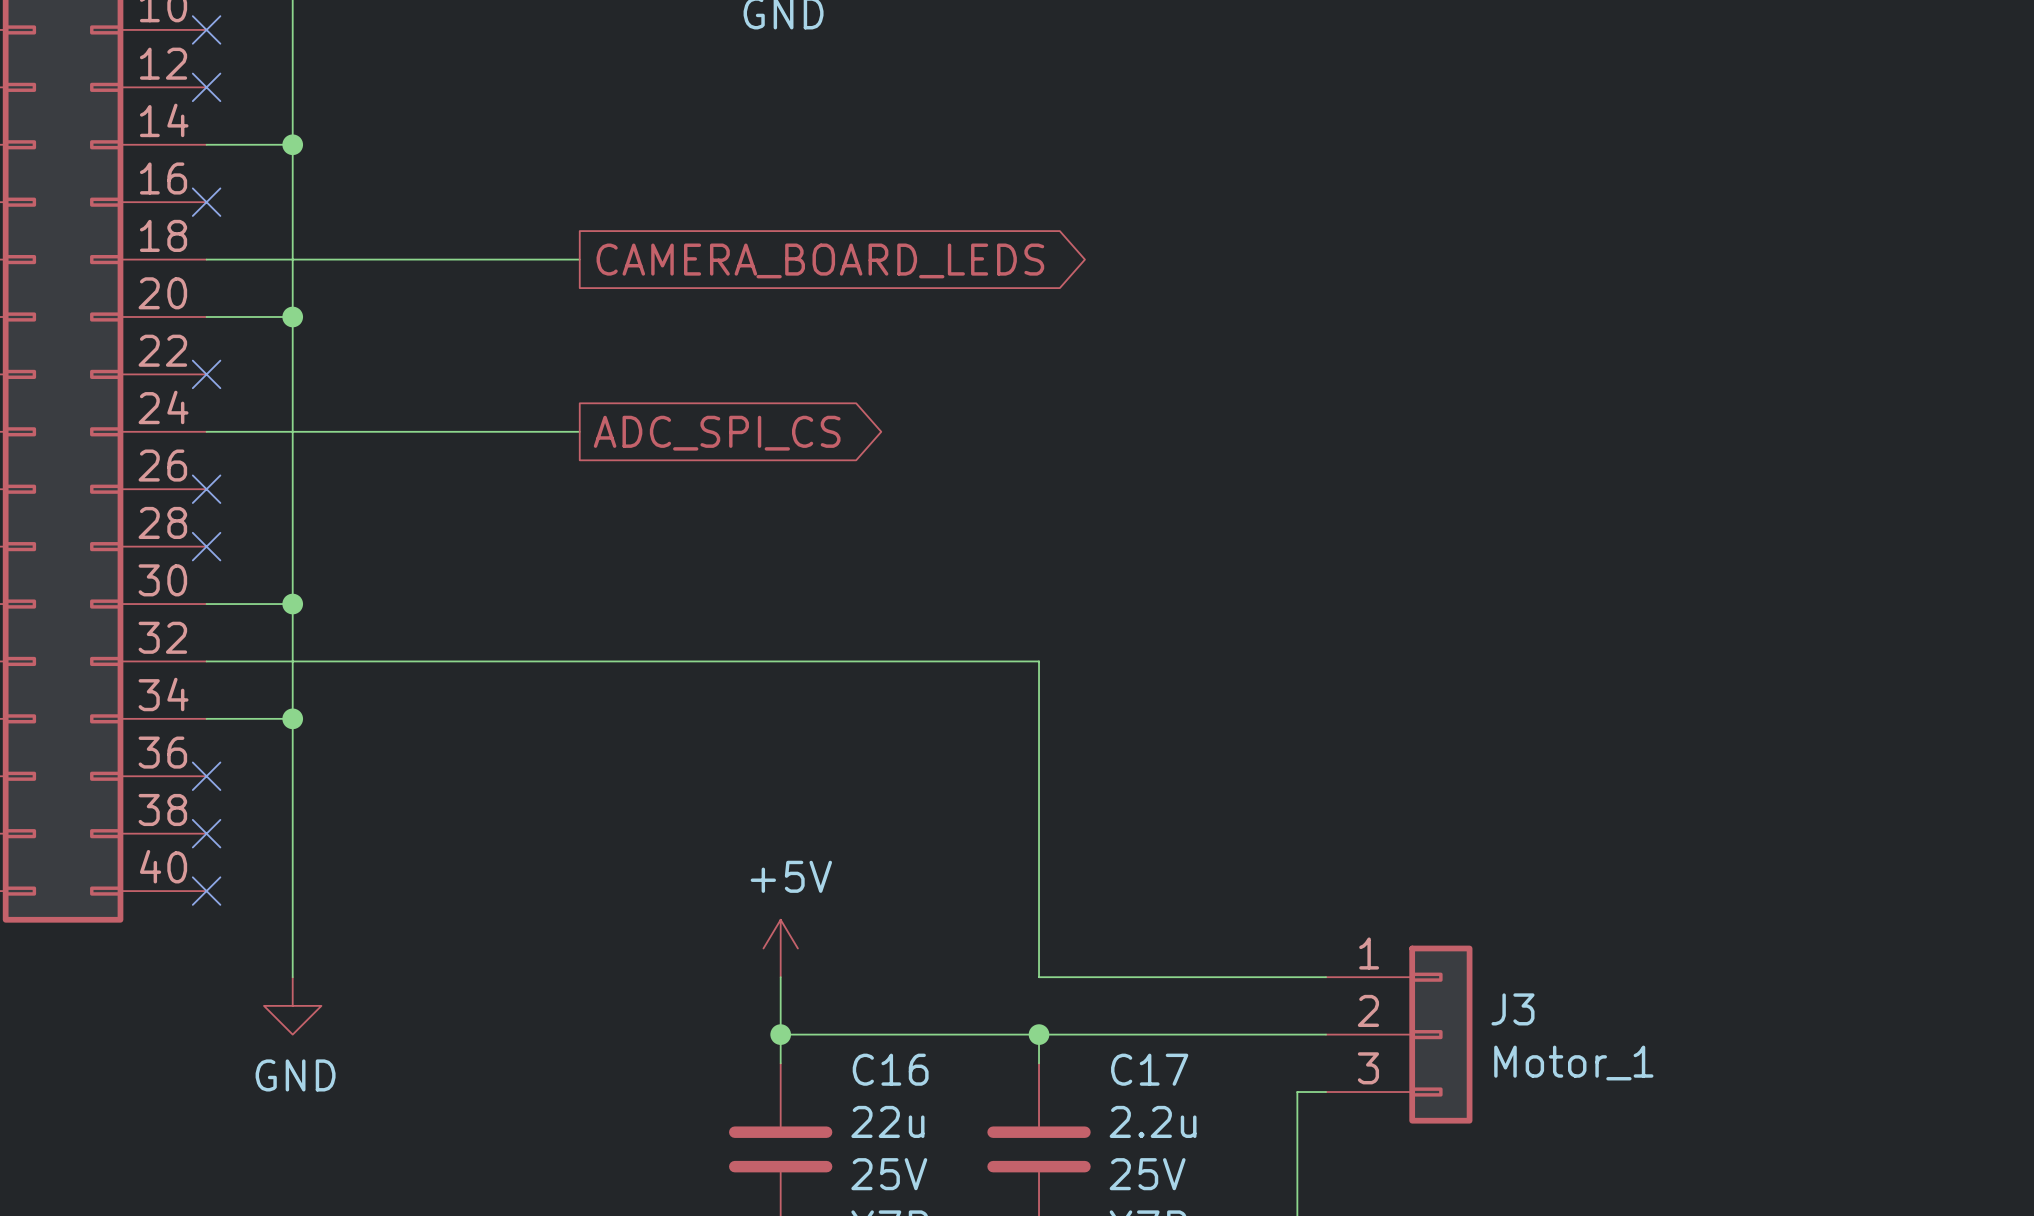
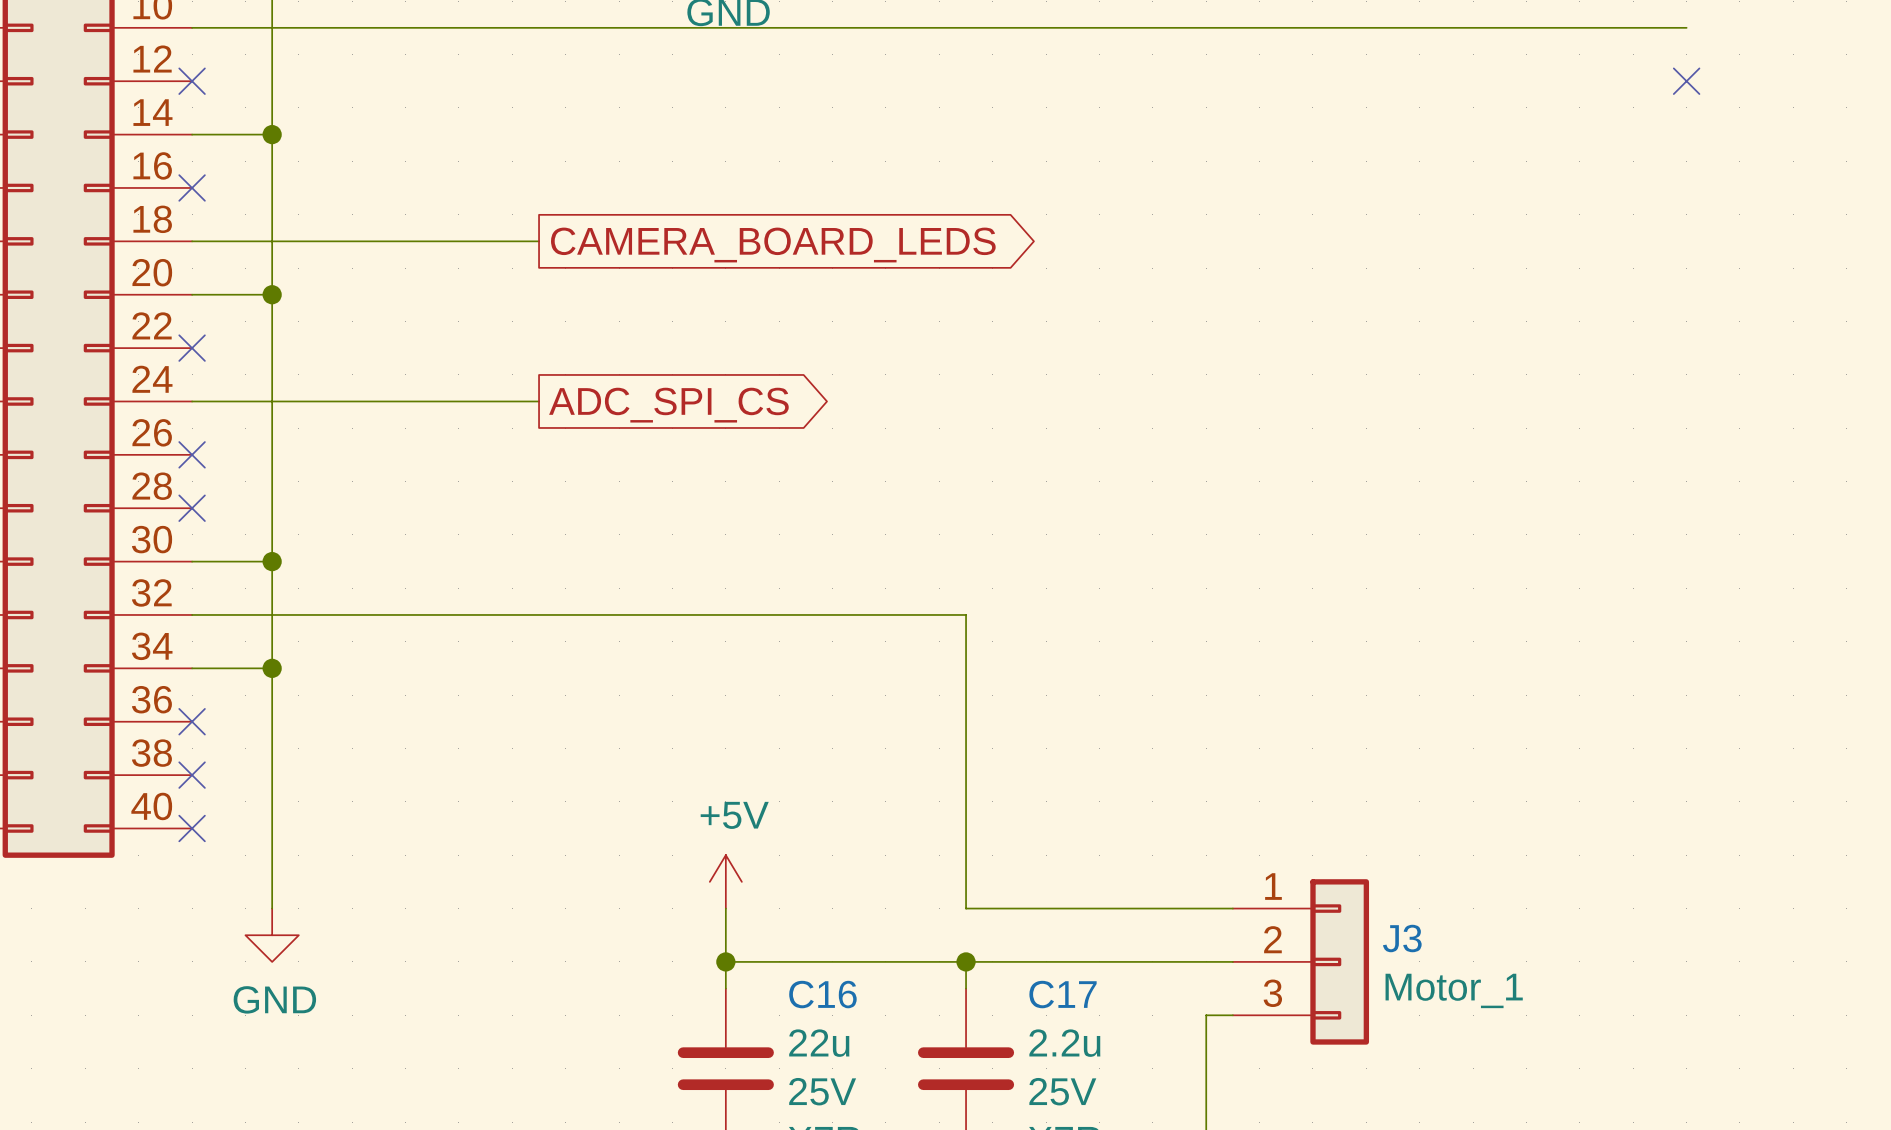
wire: none -> (192, 27) (1686, 27)
no-connect mark: (206, 29) -> none
no-connect mark: none -> (1686, 81)

